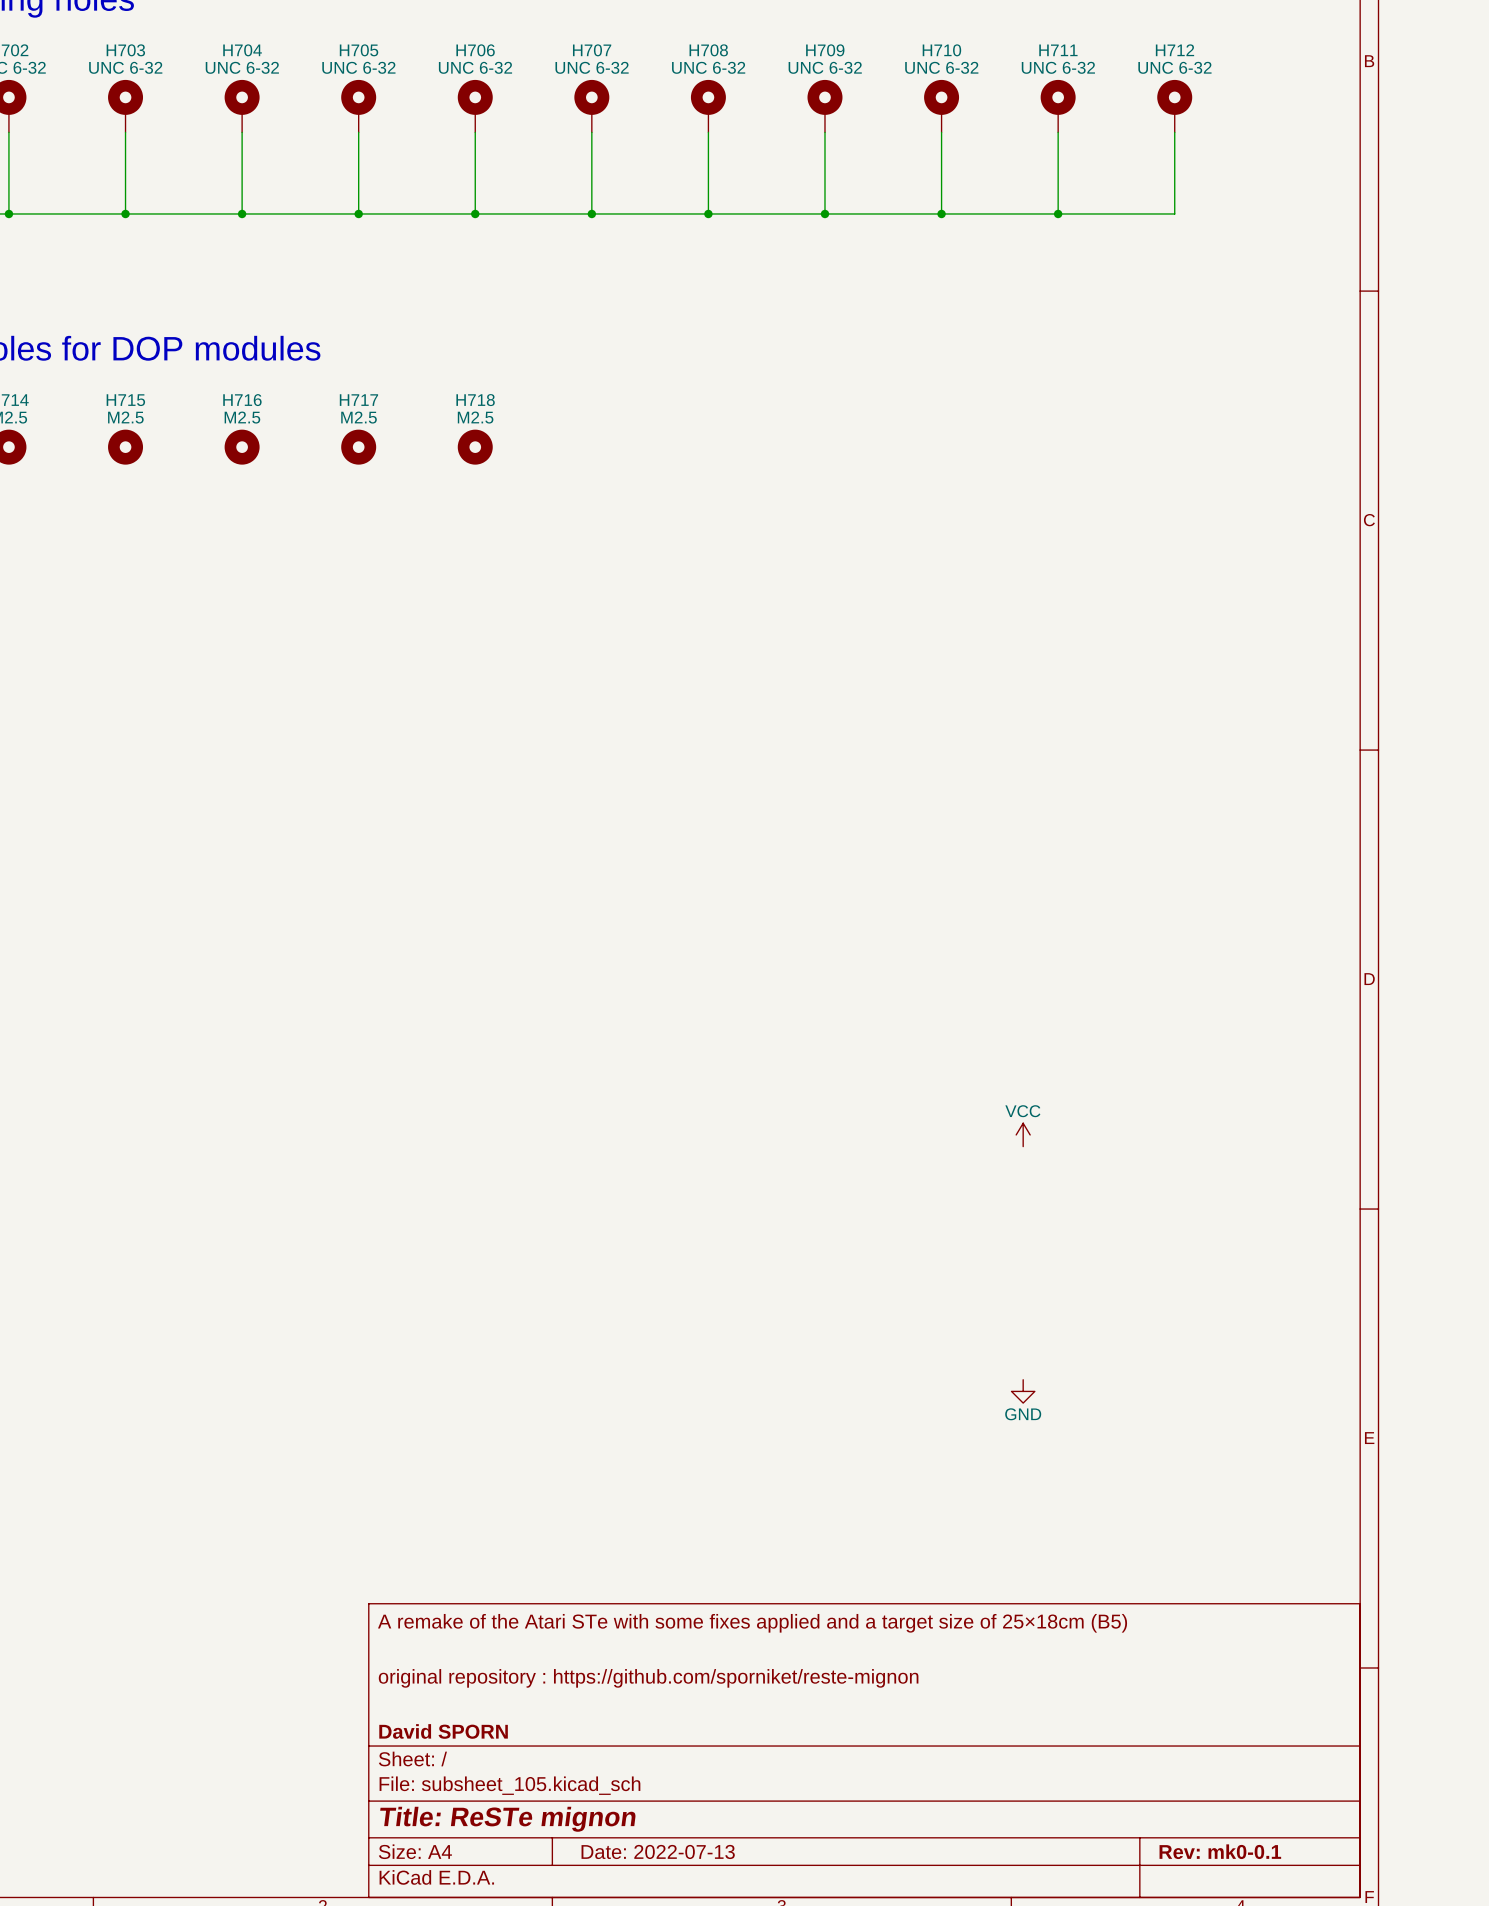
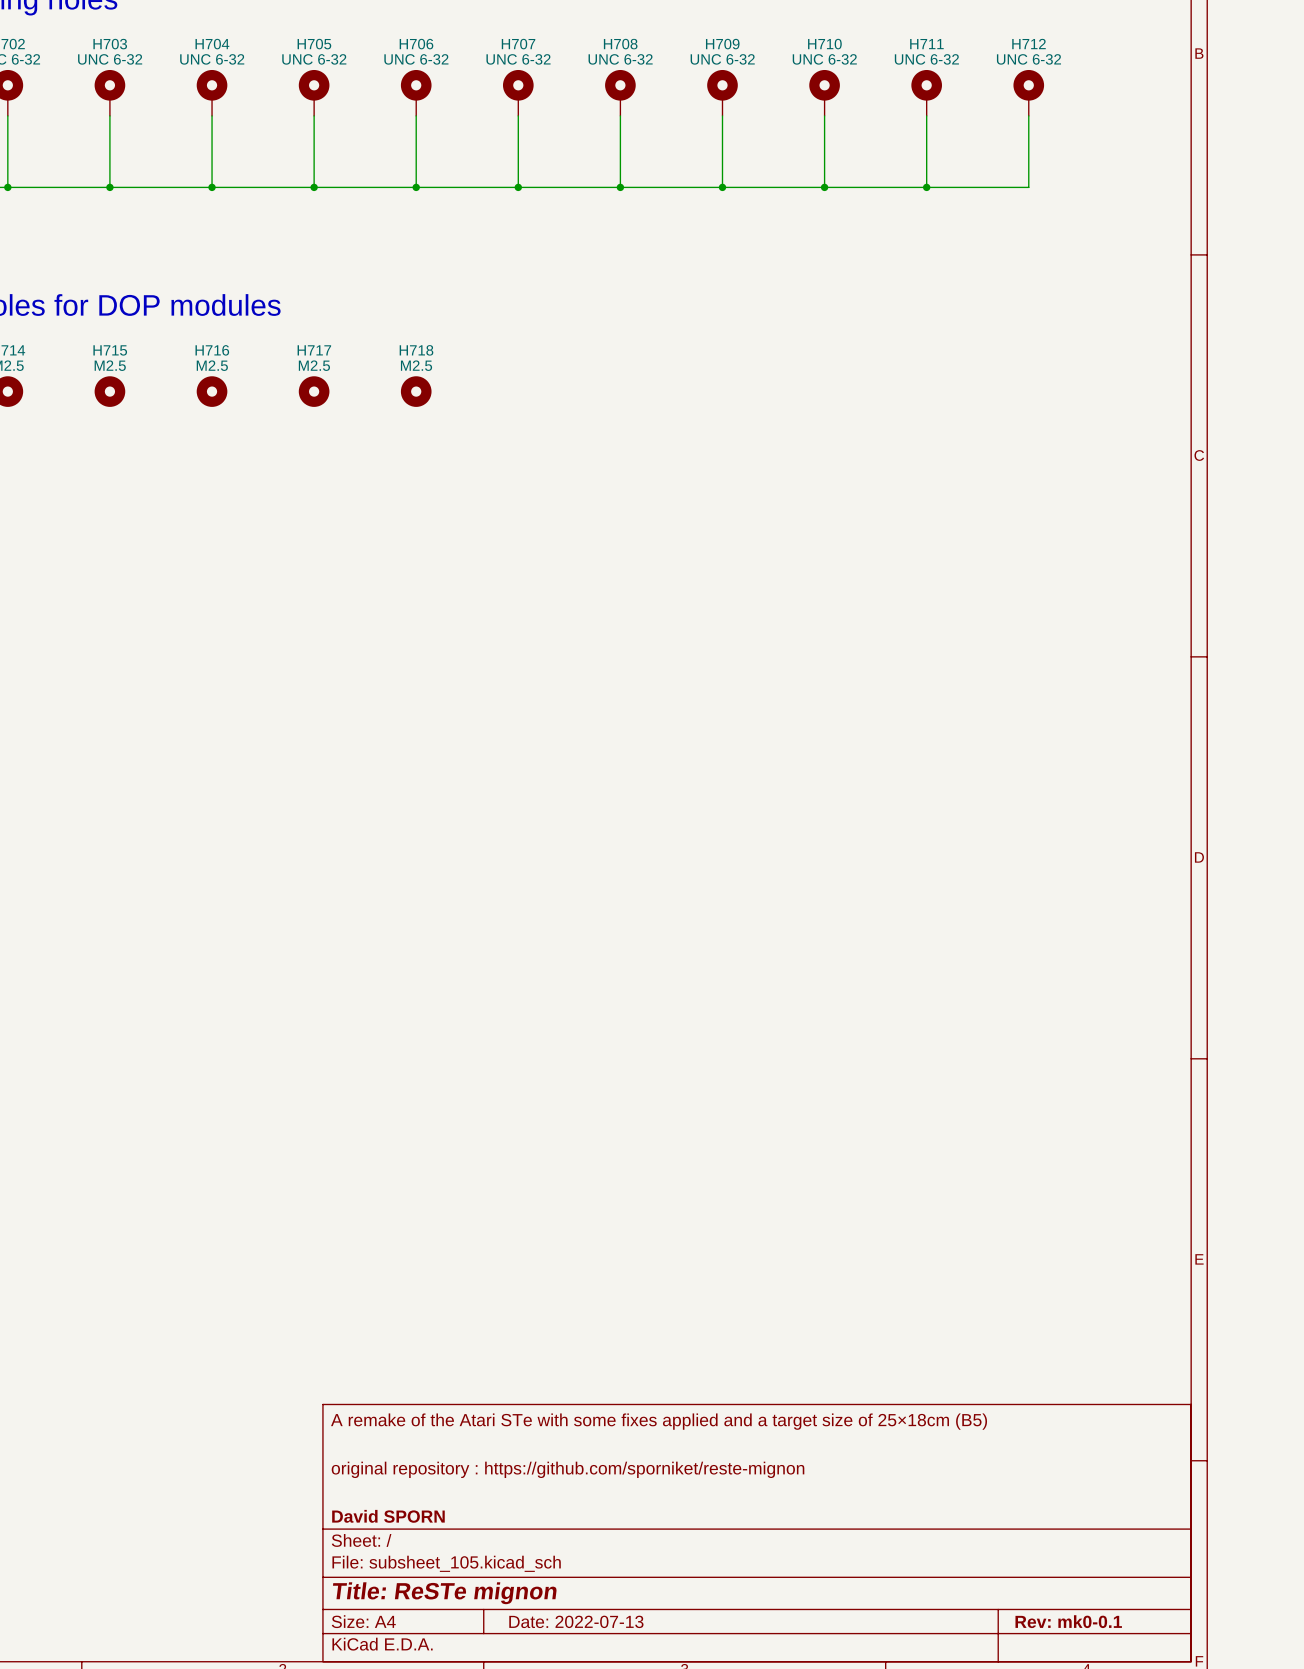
power symbol: VCC (1023, 1134) -> none
power symbol: GND (1023, 1391) -> none

